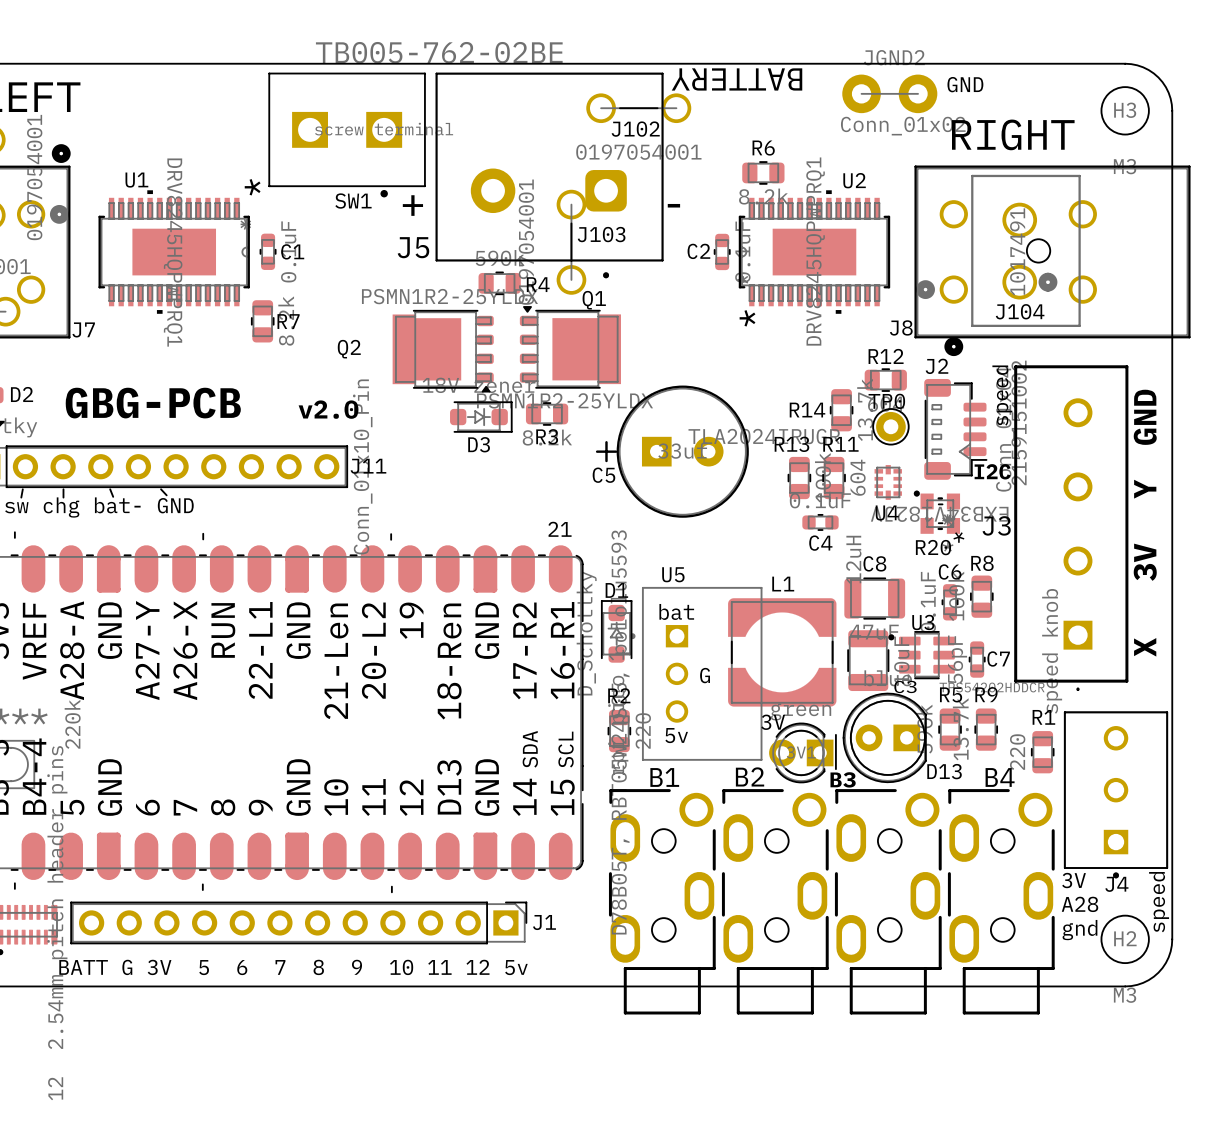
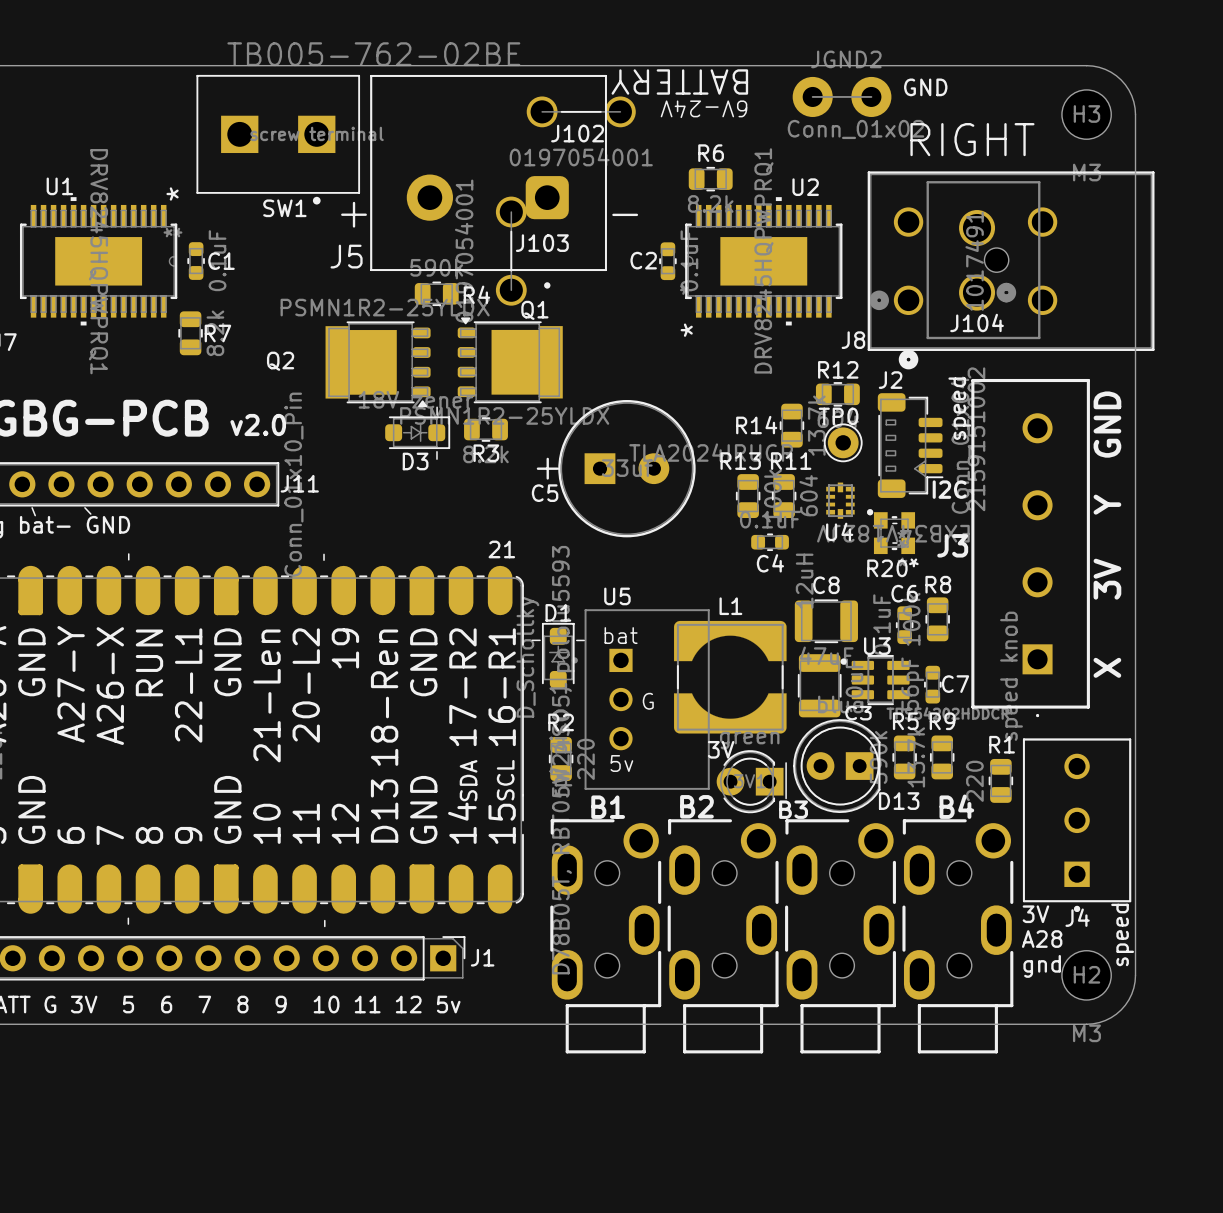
text: none -> 6V-24V (704, 109)
line: none -> (437, 407) (437, 415)
line: none -> (436, 451) (436, 459)
line: none -> (532, 640) (540, 640)
line: none -> (576, 640) (584, 640)

